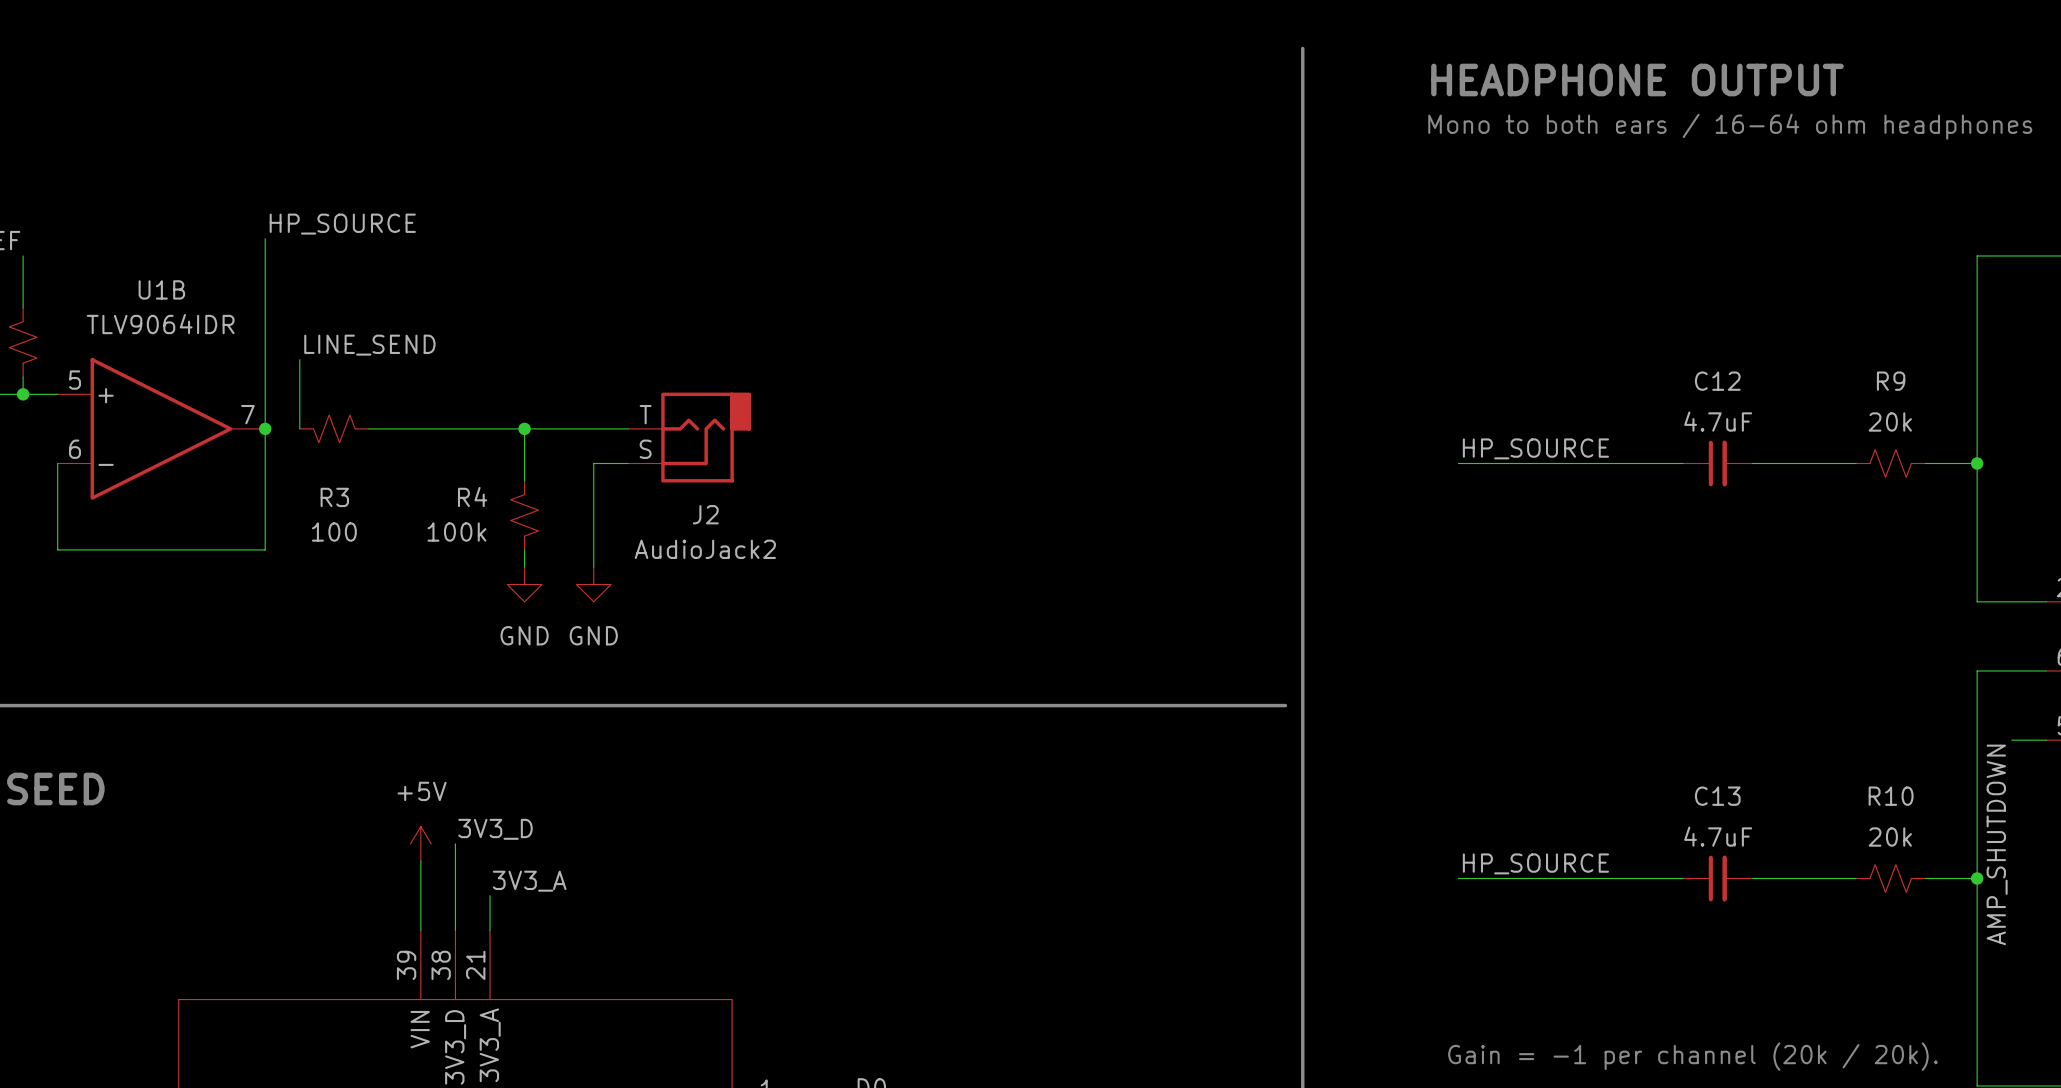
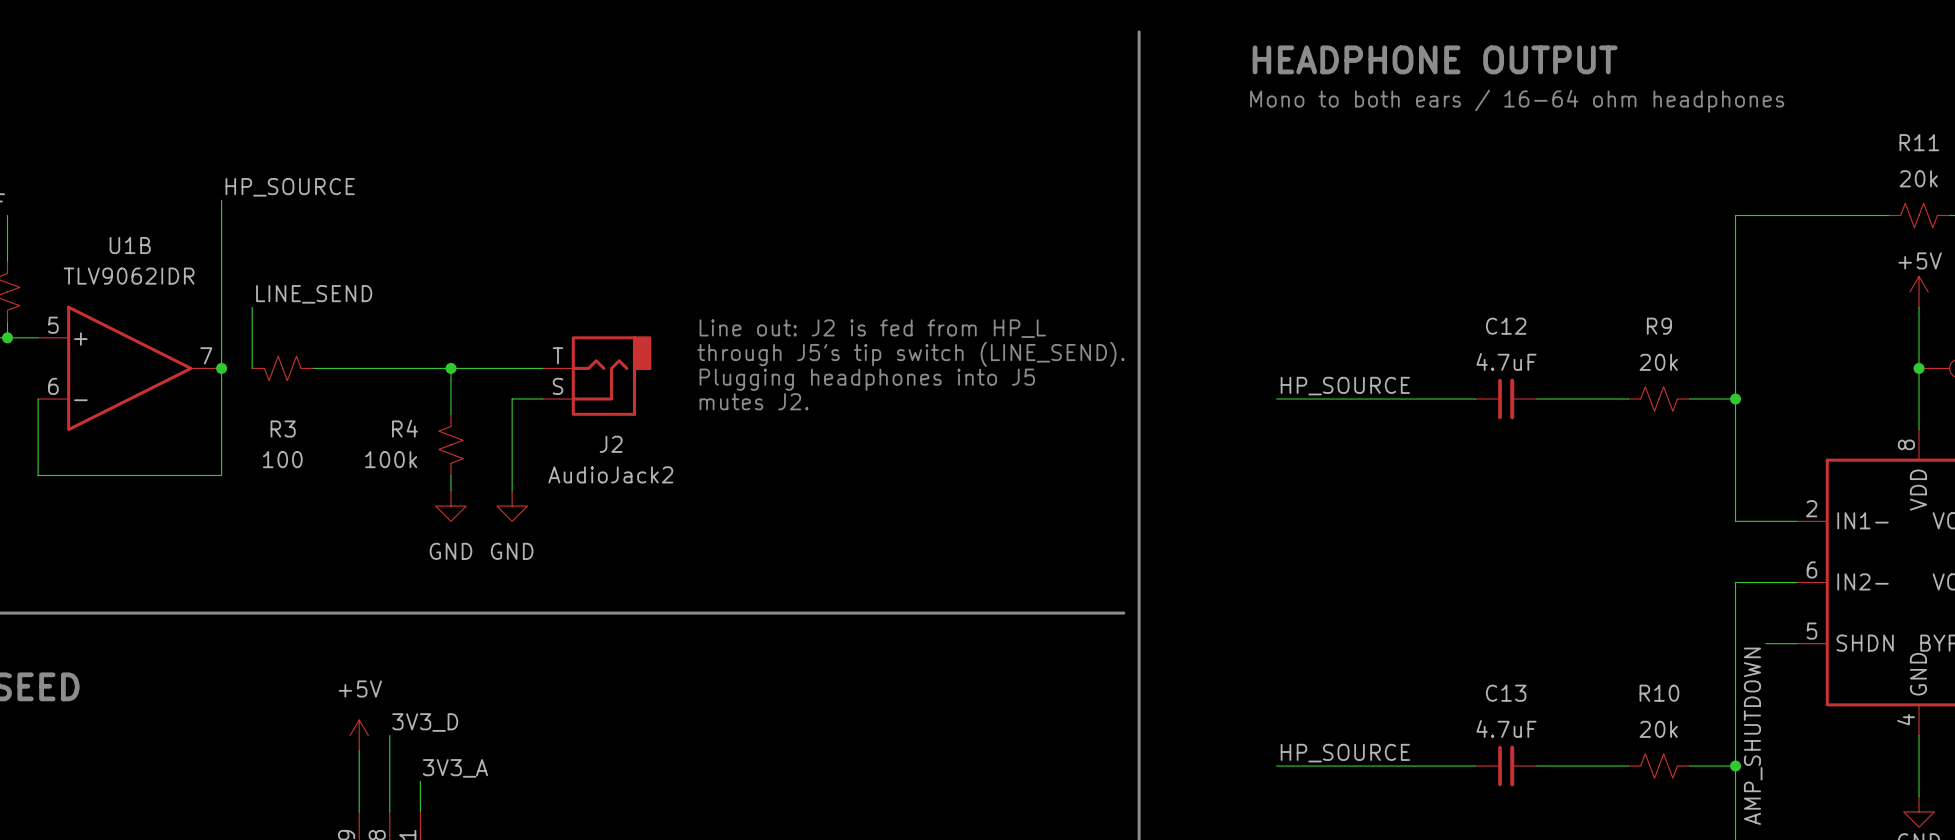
U1B value: TLV9064IDR (160, 324) -> TLV9062IDR (129, 276)
text: none -> Line out: J2 is fed from HP_L (872, 328)
text: none -> through J5's tip switch (LINE_SEND). (910, 354)
text: none -> Plugging headphones into J5 (867, 379)
text: none -> mutes J2. (754, 401)

